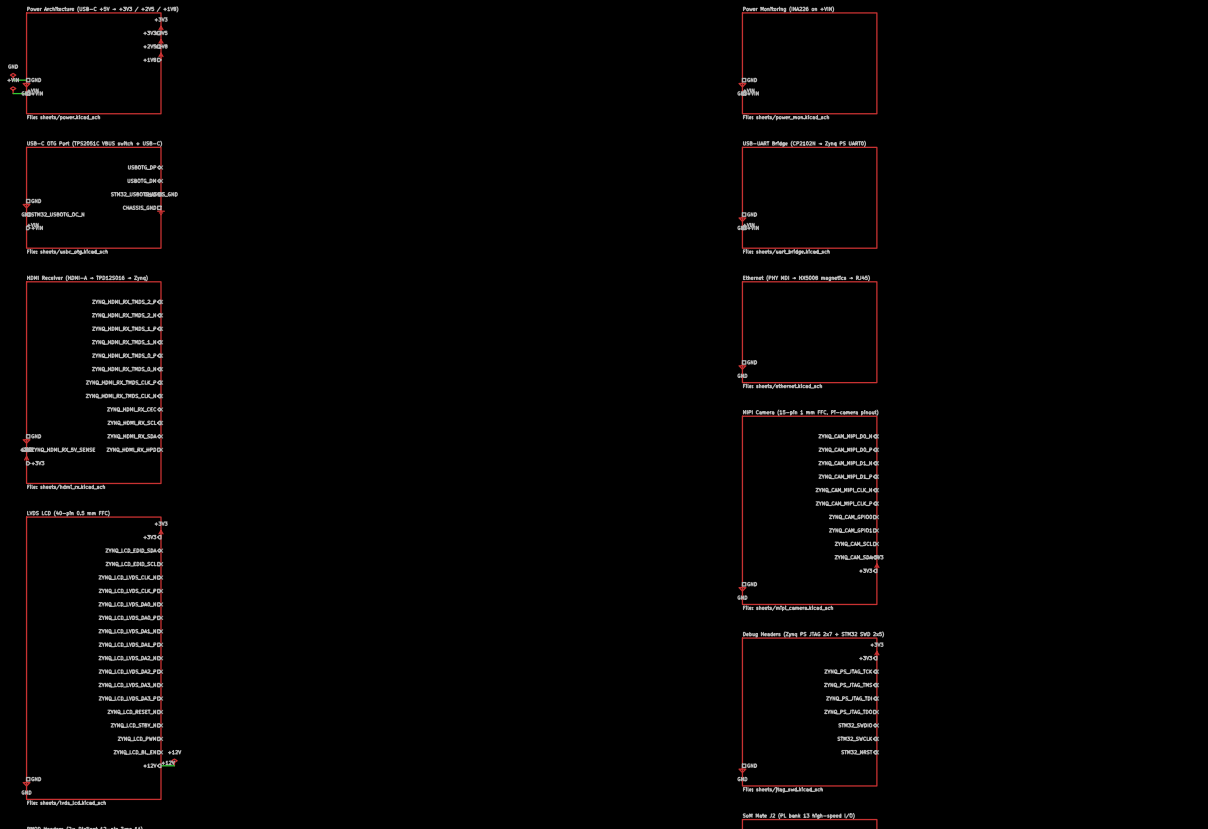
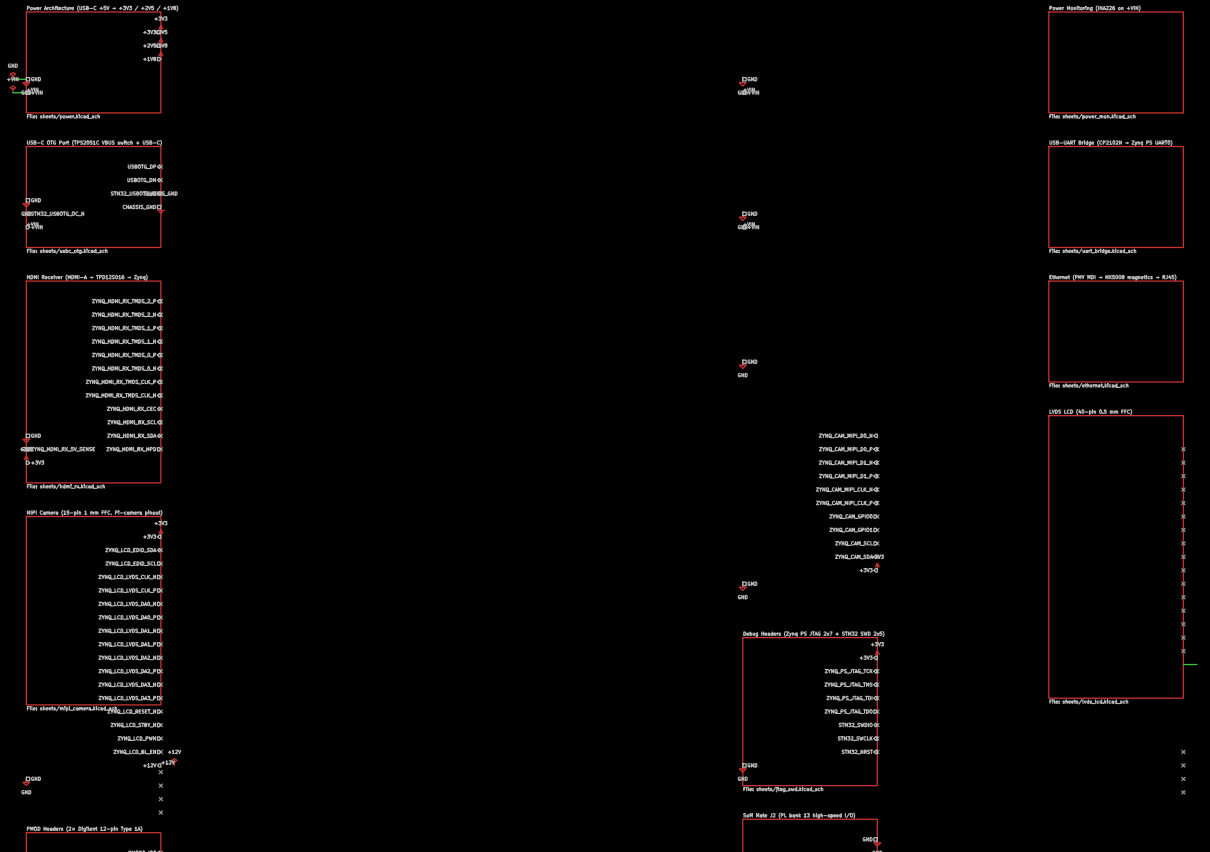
sheet position: (809, 63) -> (1116, 62)
sheet position: (809, 197) -> (1116, 197)
sheet position: (809, 332) -> (1116, 331)
no-connect mark: (876, 436) -> none
no-connect mark: none -> (1183, 449)
no-connect mark: none -> (1183, 462)
no-connect mark: none -> (1183, 476)
no-connect mark: none -> (1183, 489)
no-connect mark: none -> (1183, 503)
sheet position: (809, 510) -> (93, 610)
no-connect mark: none -> (1183, 516)
no-connect mark: none -> (1183, 529)
no-connect mark: none -> (1183, 543)
no-connect mark: none -> (1183, 556)
no-connect mark: none -> (1183, 570)
no-connect mark: none -> (1183, 583)
no-connect mark: none -> (1183, 597)
no-connect mark: none -> (1183, 610)
no-connect mark: none -> (1183, 624)
no-connect mark: none -> (1183, 637)
no-connect mark: none -> (1183, 651)
sheet position: (93, 658) -> (1116, 556)
wire: none -> (1183, 664) (1196, 664)
no-connect mark: none -> (1183, 751)
wire: (160, 765) (174, 765) -> none
no-connect mark: none -> (1183, 765)
no-connect mark: none -> (160, 772)
no-connect mark: none -> (1183, 778)
no-connect mark: none -> (160, 785)
no-connect mark: none -> (1183, 792)
no-connect mark: none -> (160, 799)
no-connect mark: none -> (160, 812)

